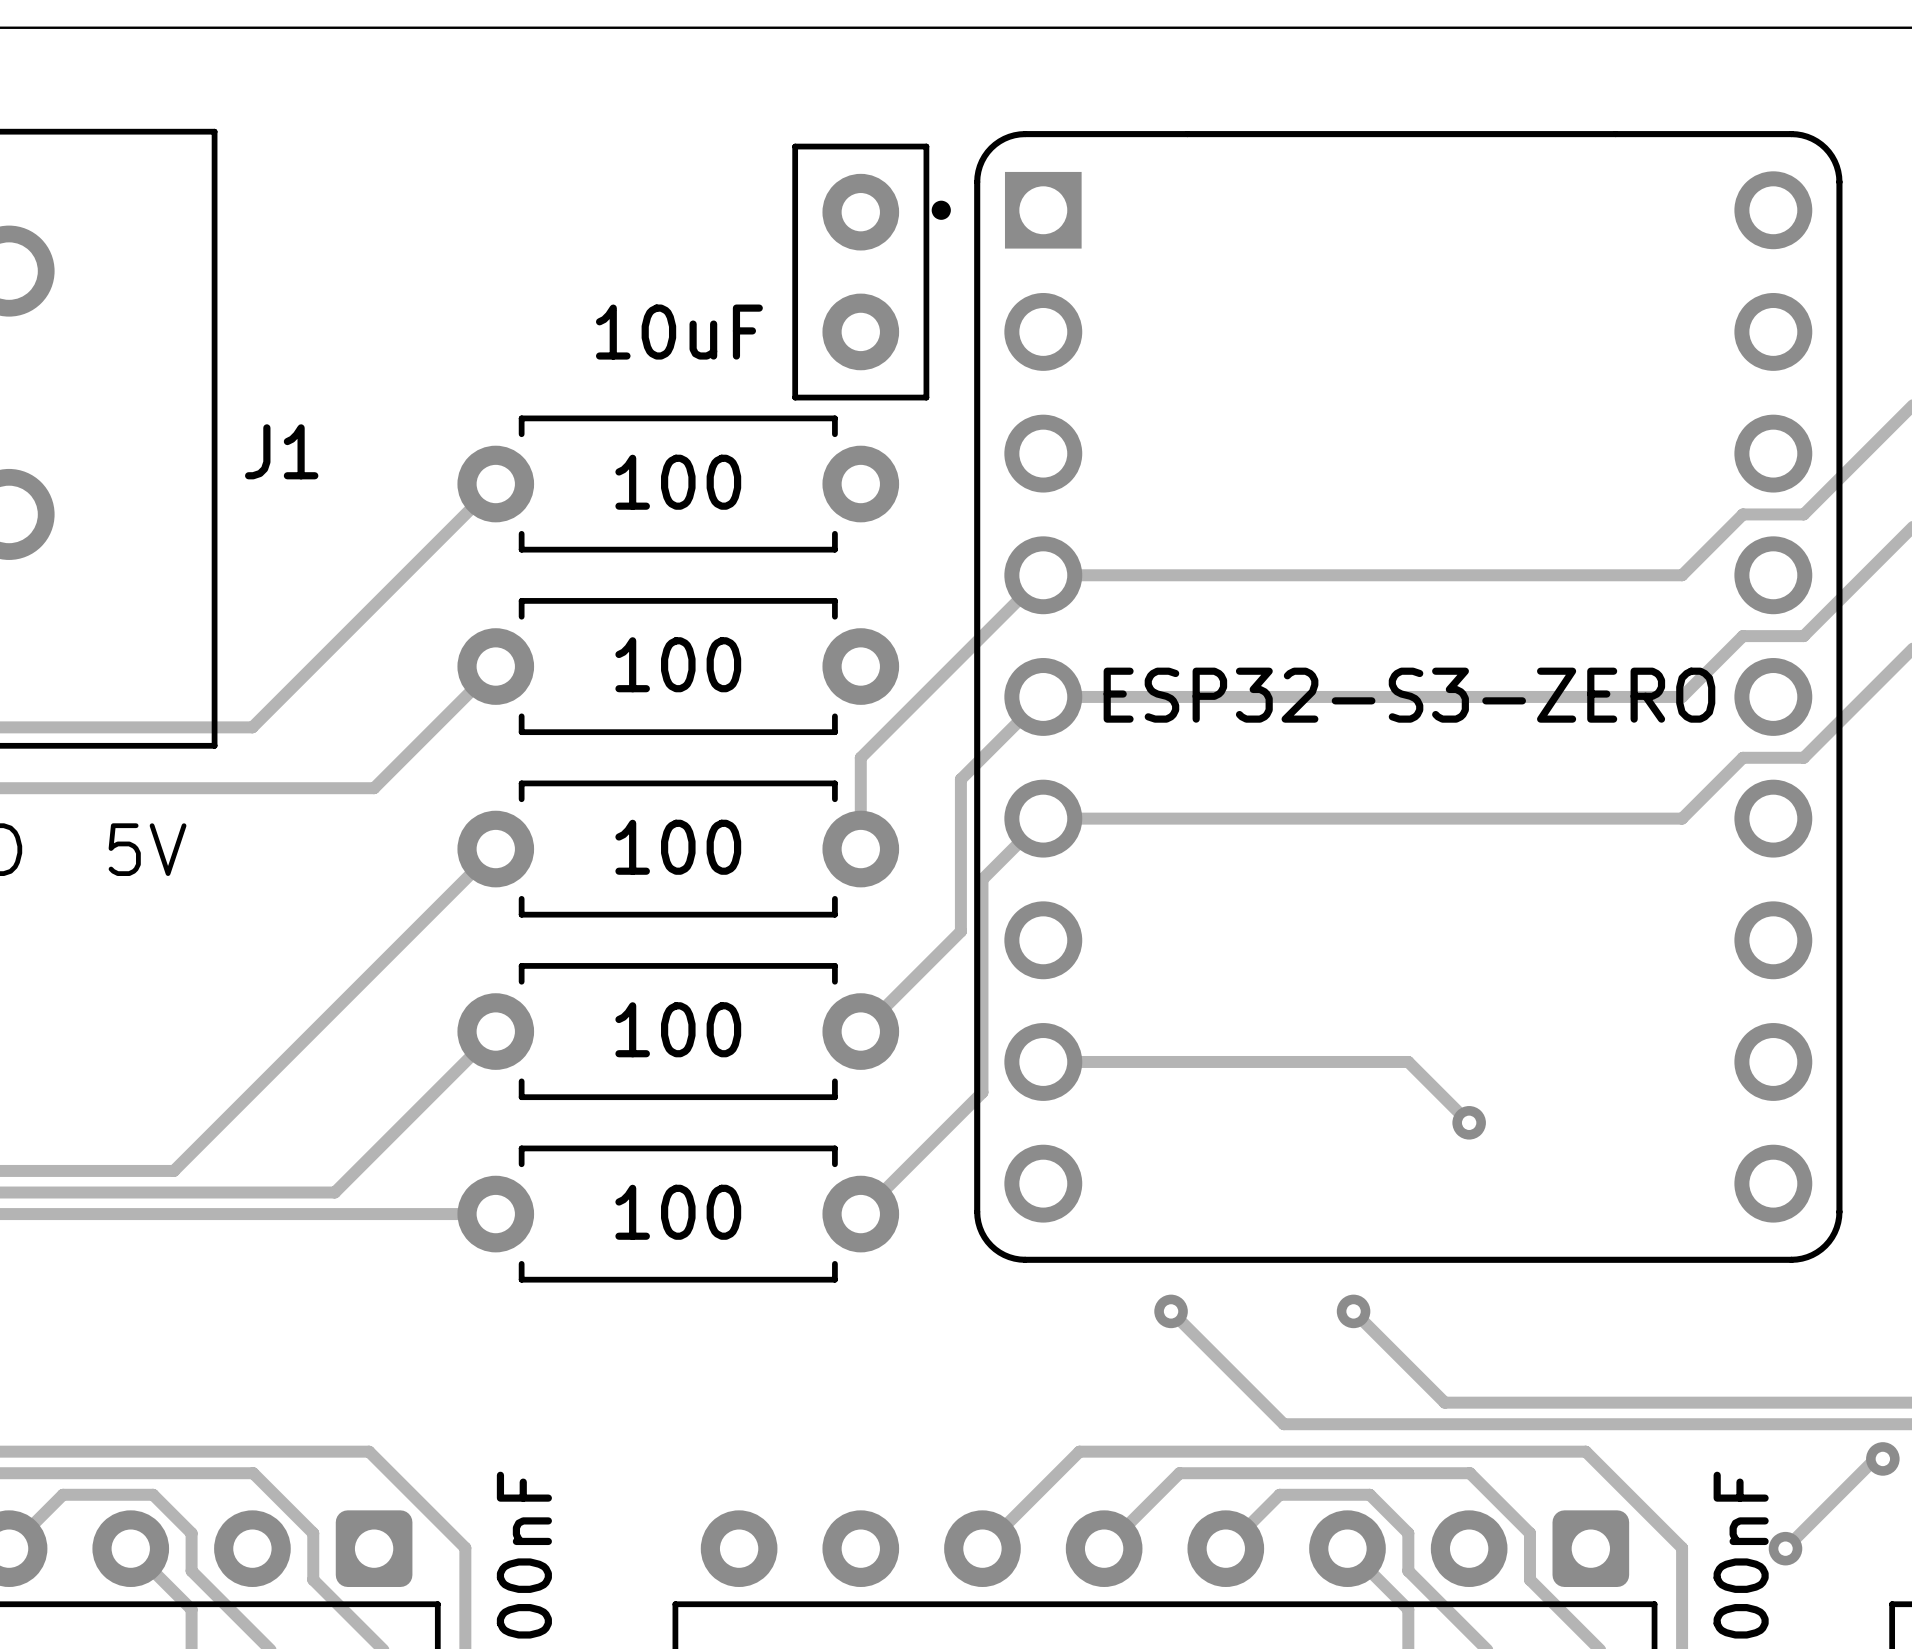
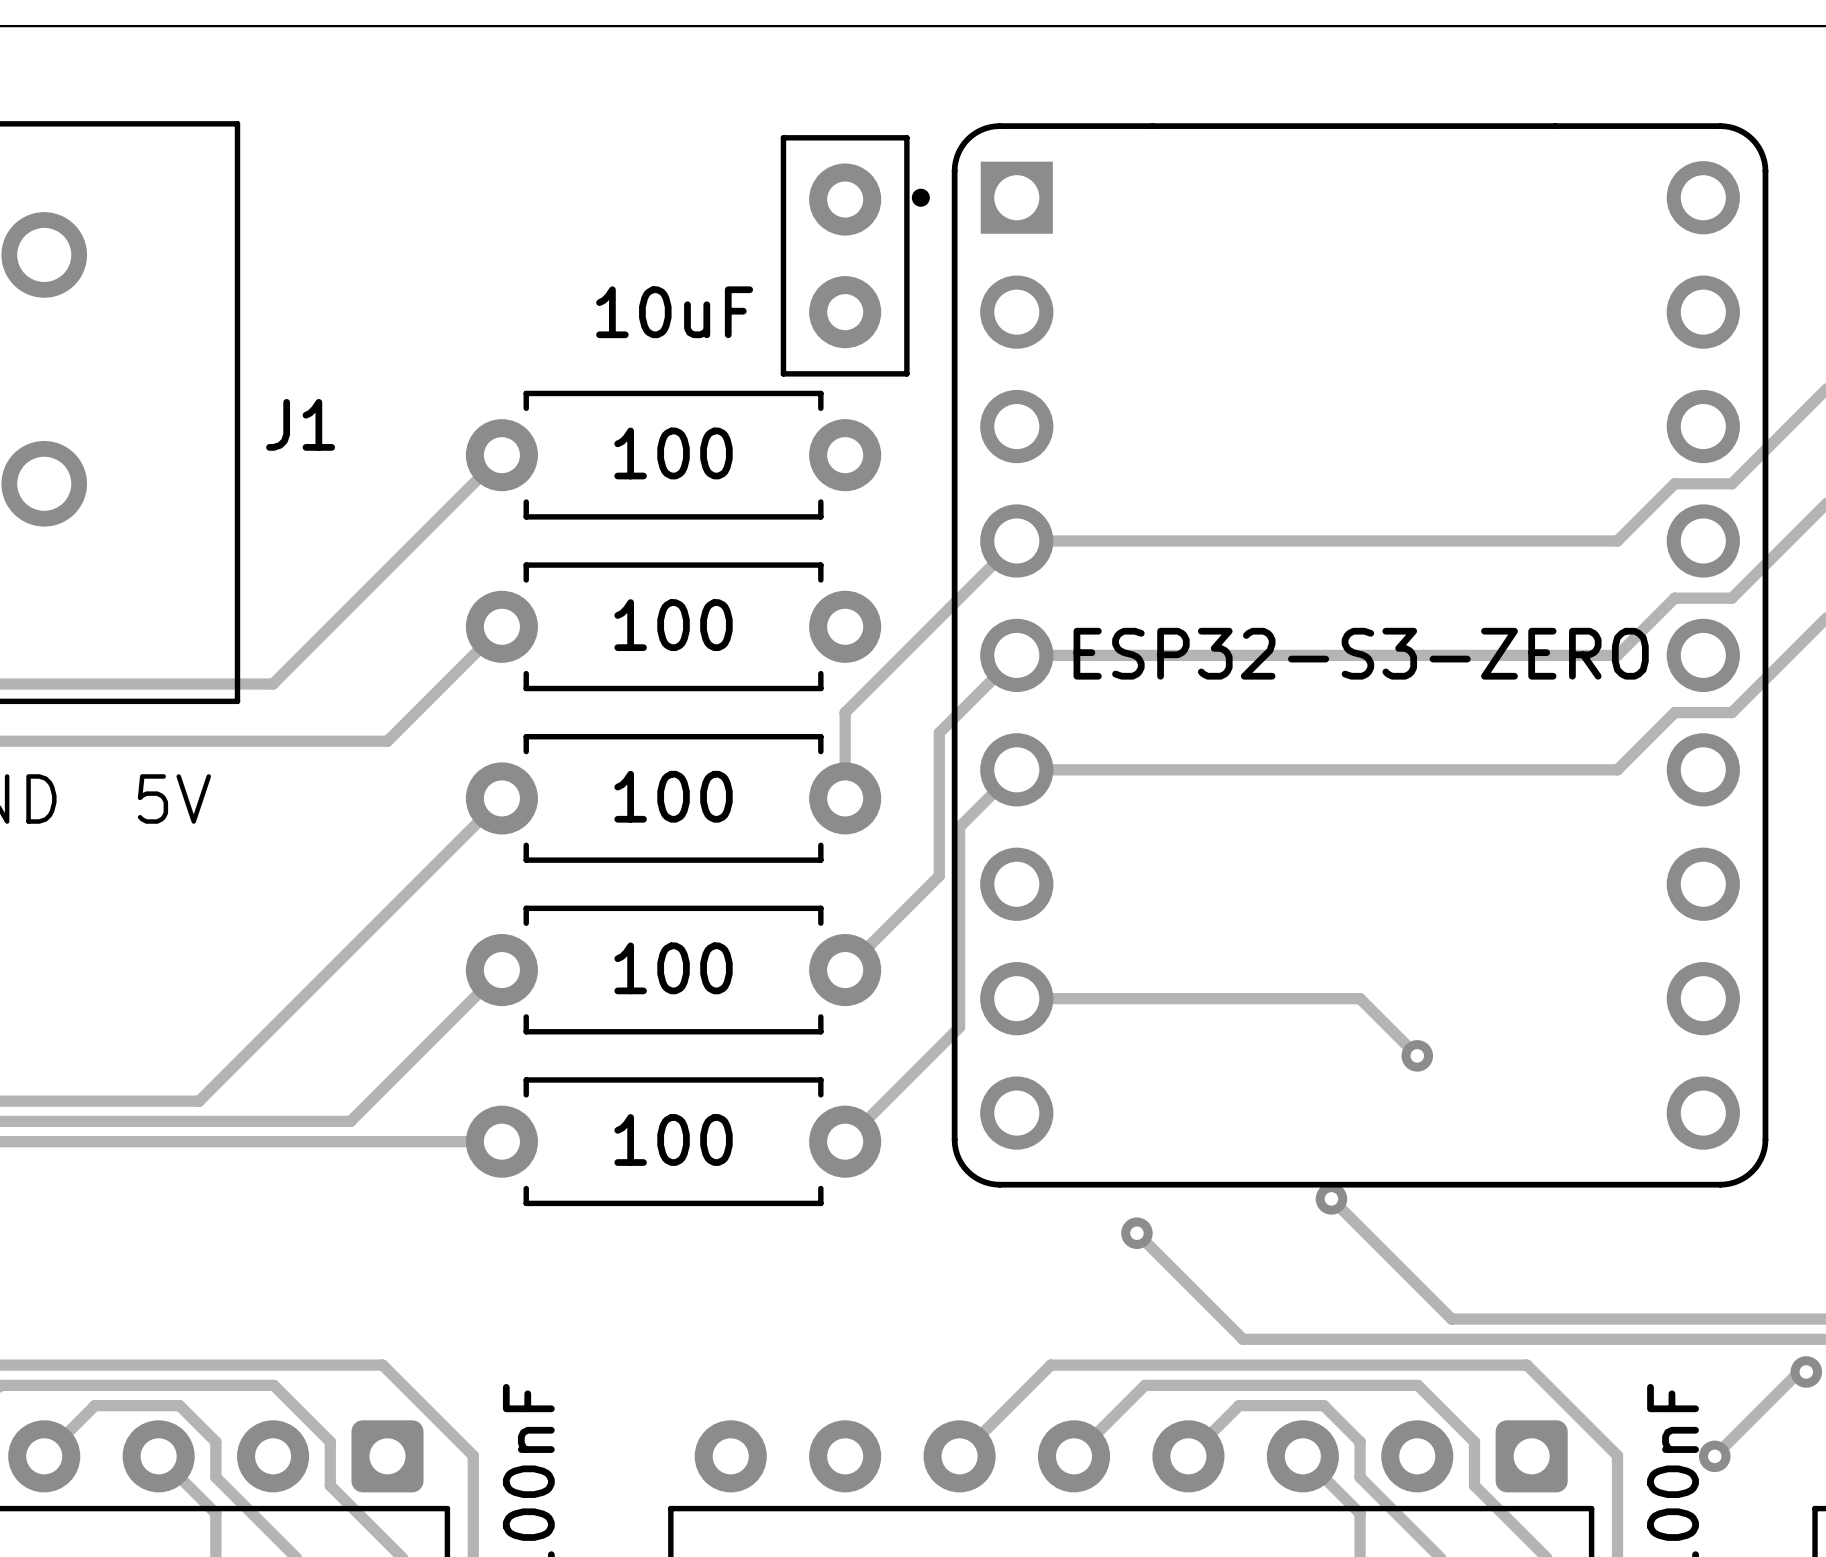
track: (1353, 1311) (1444, 1402) (1505, 1402) -> (1331, 1198) (1451, 1319)
via position: (1353, 1311) -> (1331, 1198)

